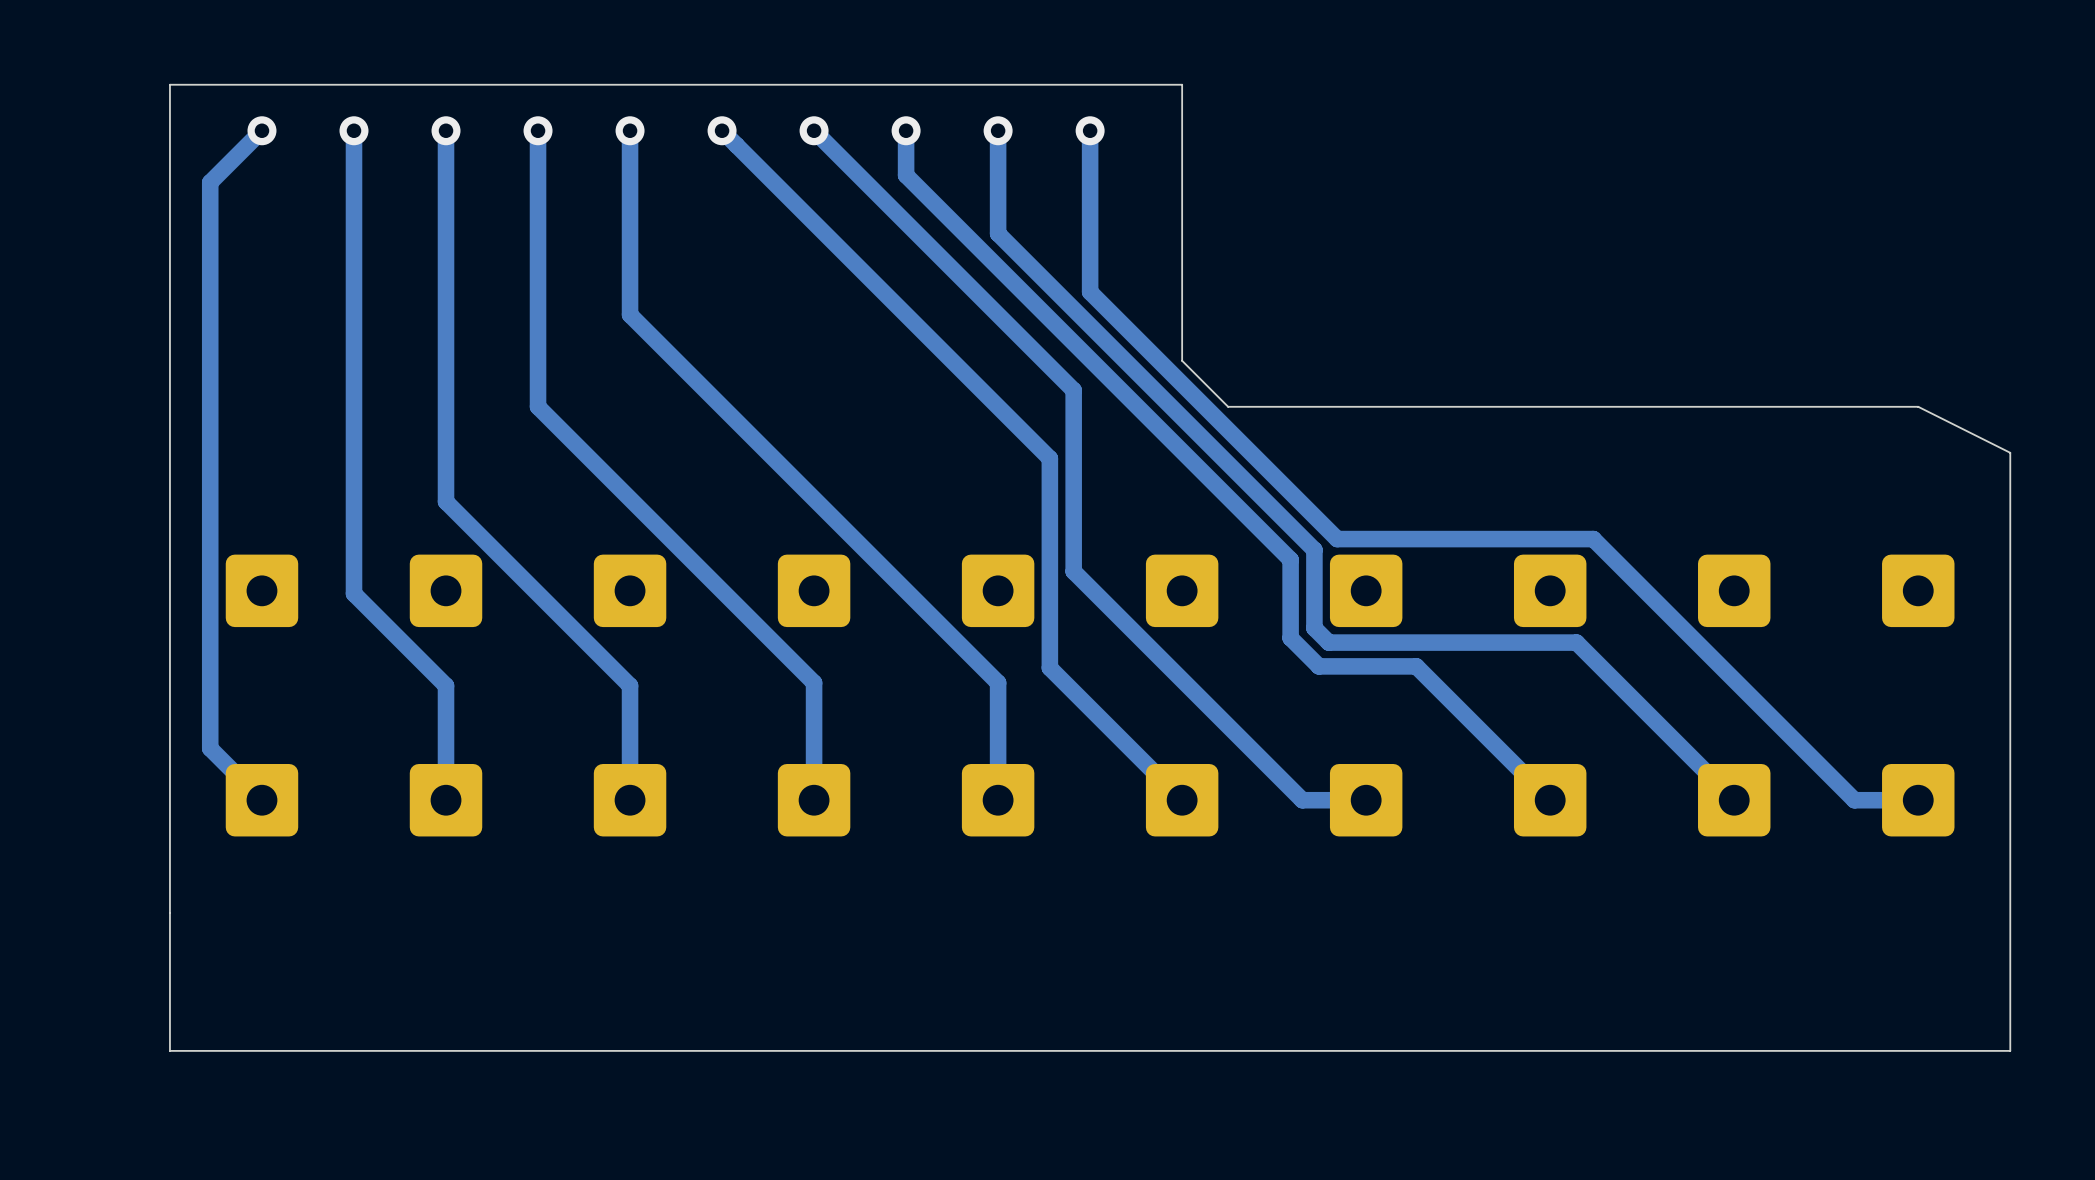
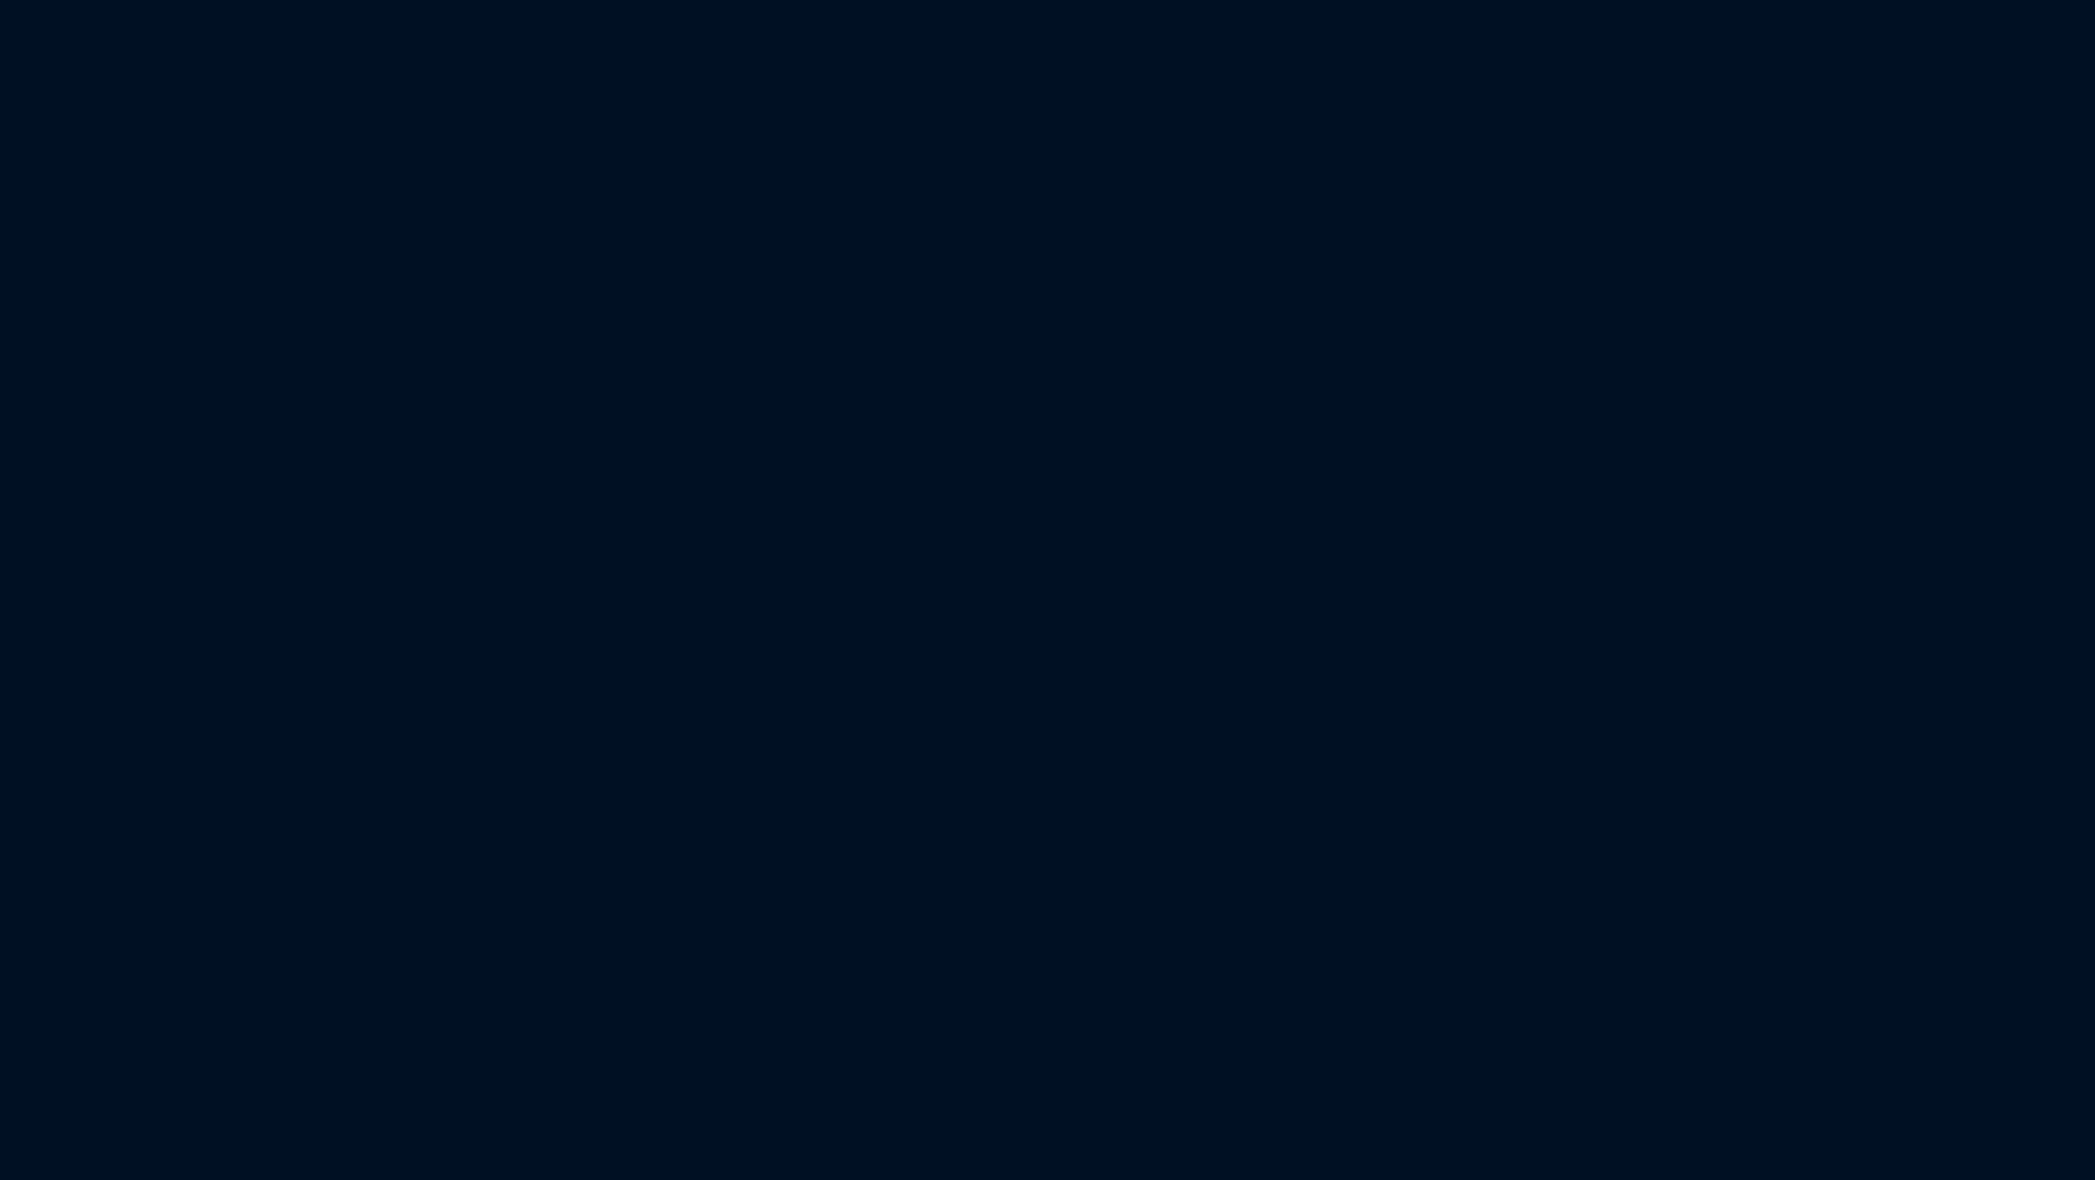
board edge: (1182, 84) (169, 84) (169, 1050) (2010, 1050) (2010, 452) (1918, 406) (1228, 406) (1182, 360) (1182, 84) -> none
track: (261, 130) (210, 182) (210, 748) (261, 800) -> none
via: (261, 130) -> none
track: (354, 130) (354, 593) (446, 685) (446, 800) -> none
via: (354, 130) -> none
track: (446, 130) (446, 501) (630, 685) (630, 800) -> none
via: (446, 130) -> none
track: (538, 130) (538, 406) (814, 682) (814, 800) -> none
via: (538, 130) -> none
track: (630, 130) (630, 314) (998, 682) (998, 800) -> none
via: (630, 130) -> none
track: (722, 130) (1049, 458) (1049, 667) (1182, 800) -> none
via: (722, 130) -> none
track: (814, 130) (1073, 390) (1073, 571) (1302, 800) (1366, 800) -> none
via: (814, 130) -> none
track: (906, 130) (906, 175) (1290, 559) (1290, 638) (1318, 666) (1416, 666) (1550, 800) -> none
via: (906, 130) -> none
track: (998, 130) (998, 233) (1314, 549) (1314, 628) (1328, 642) (1576, 642) (1734, 800) -> none
via: (998, 130) -> none
track: (1090, 130) (1090, 292) (1337, 539) (1593, 539) (1854, 800) (1918, 800) -> none
via: (1090, 130) -> none
part: (261, 590) -> none
part: (446, 590) -> none
part: (630, 590) -> none
part: (814, 590) -> none
part: (998, 590) -> none
part: (1182, 590) -> none
part: (1366, 590) -> none
part: (1550, 590) -> none
part: (1734, 590) -> none
part: (1918, 590) -> none
part: (261, 800) -> none
part: (446, 800) -> none
part: (630, 800) -> none
part: (814, 800) -> none
part: (998, 800) -> none
part: (1182, 800) -> none
part: (1366, 800) -> none
part: (1550, 800) -> none
part: (1734, 800) -> none
part: (1918, 800) -> none

